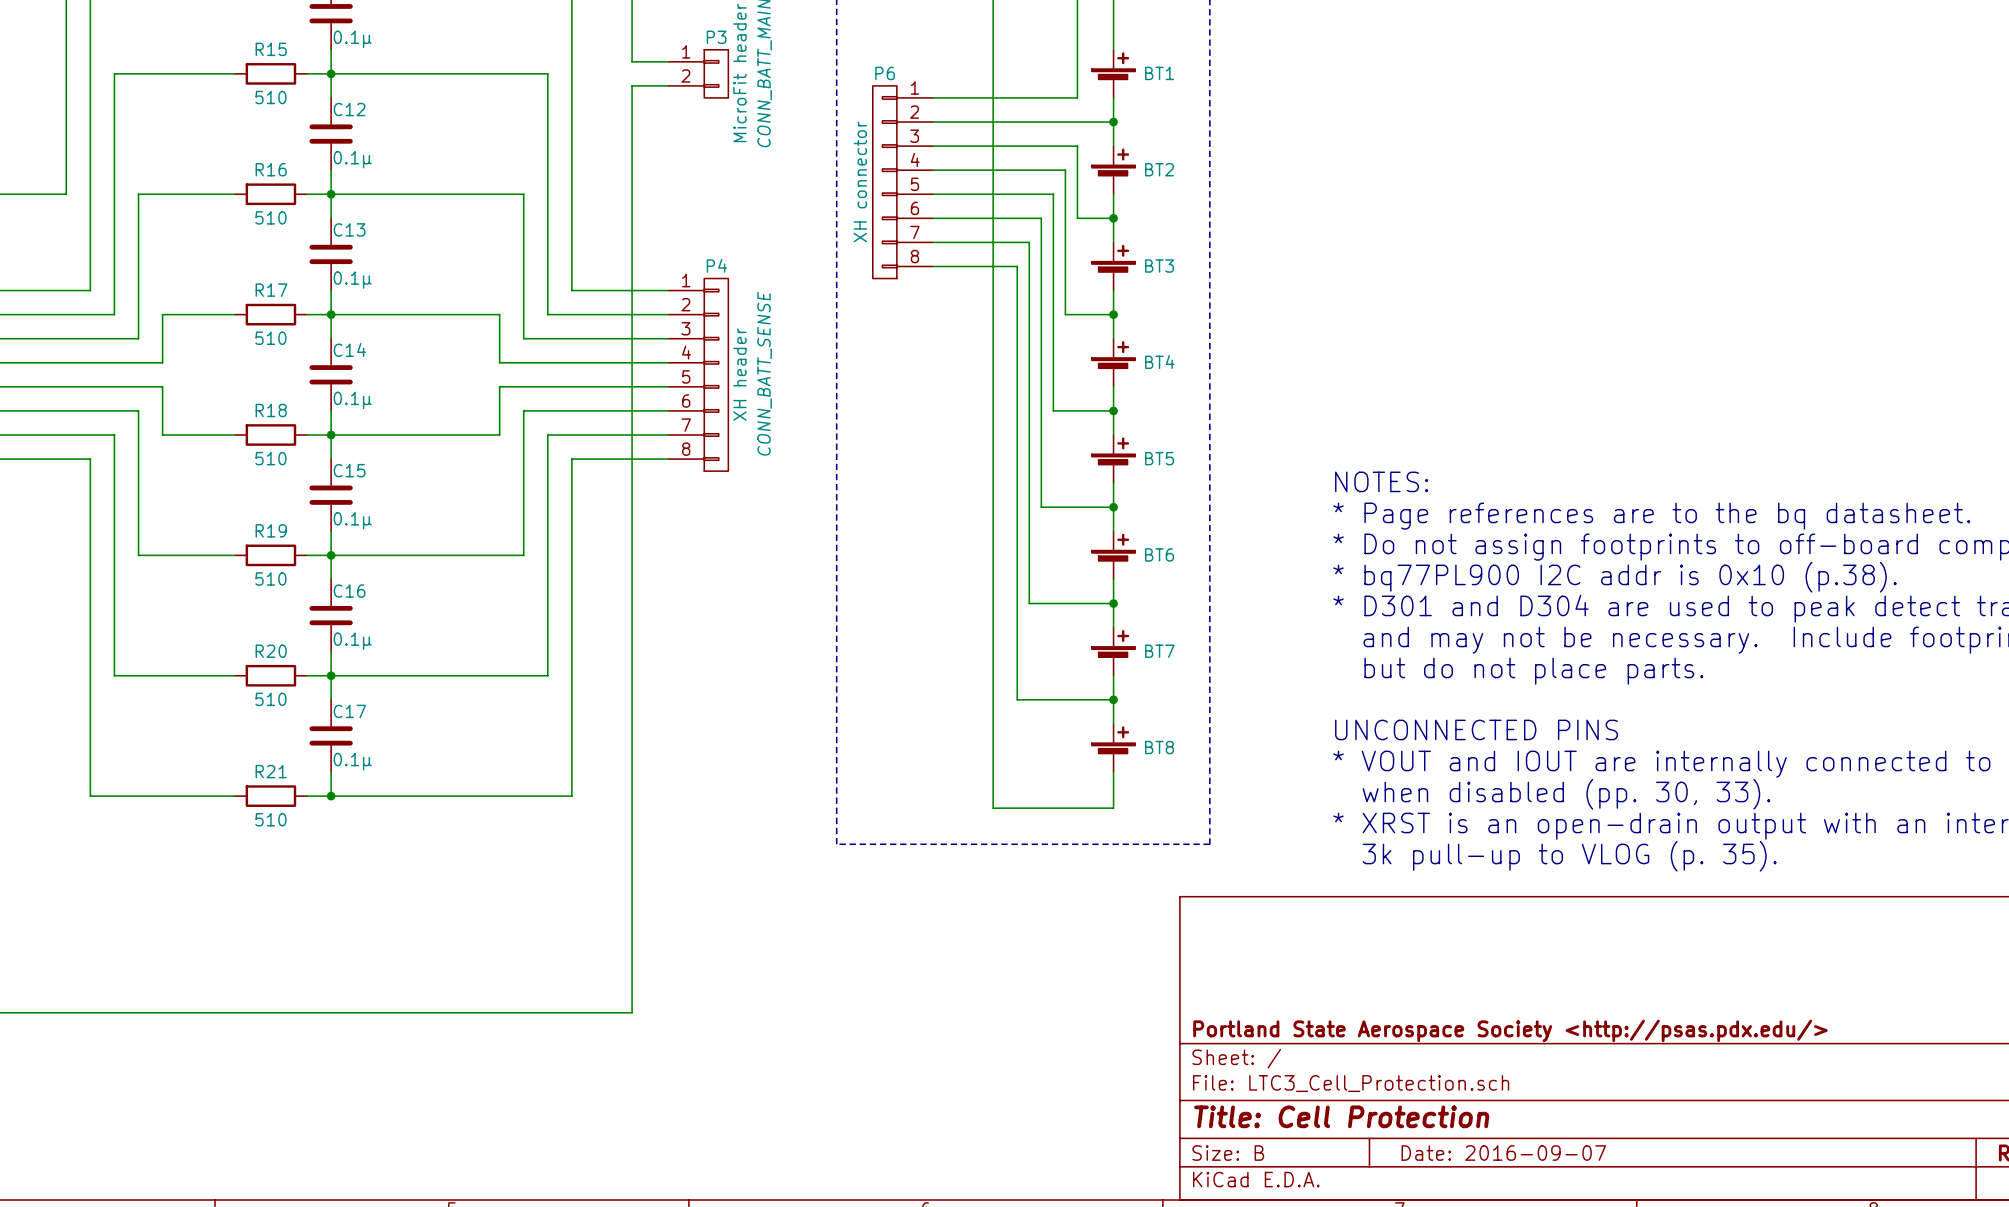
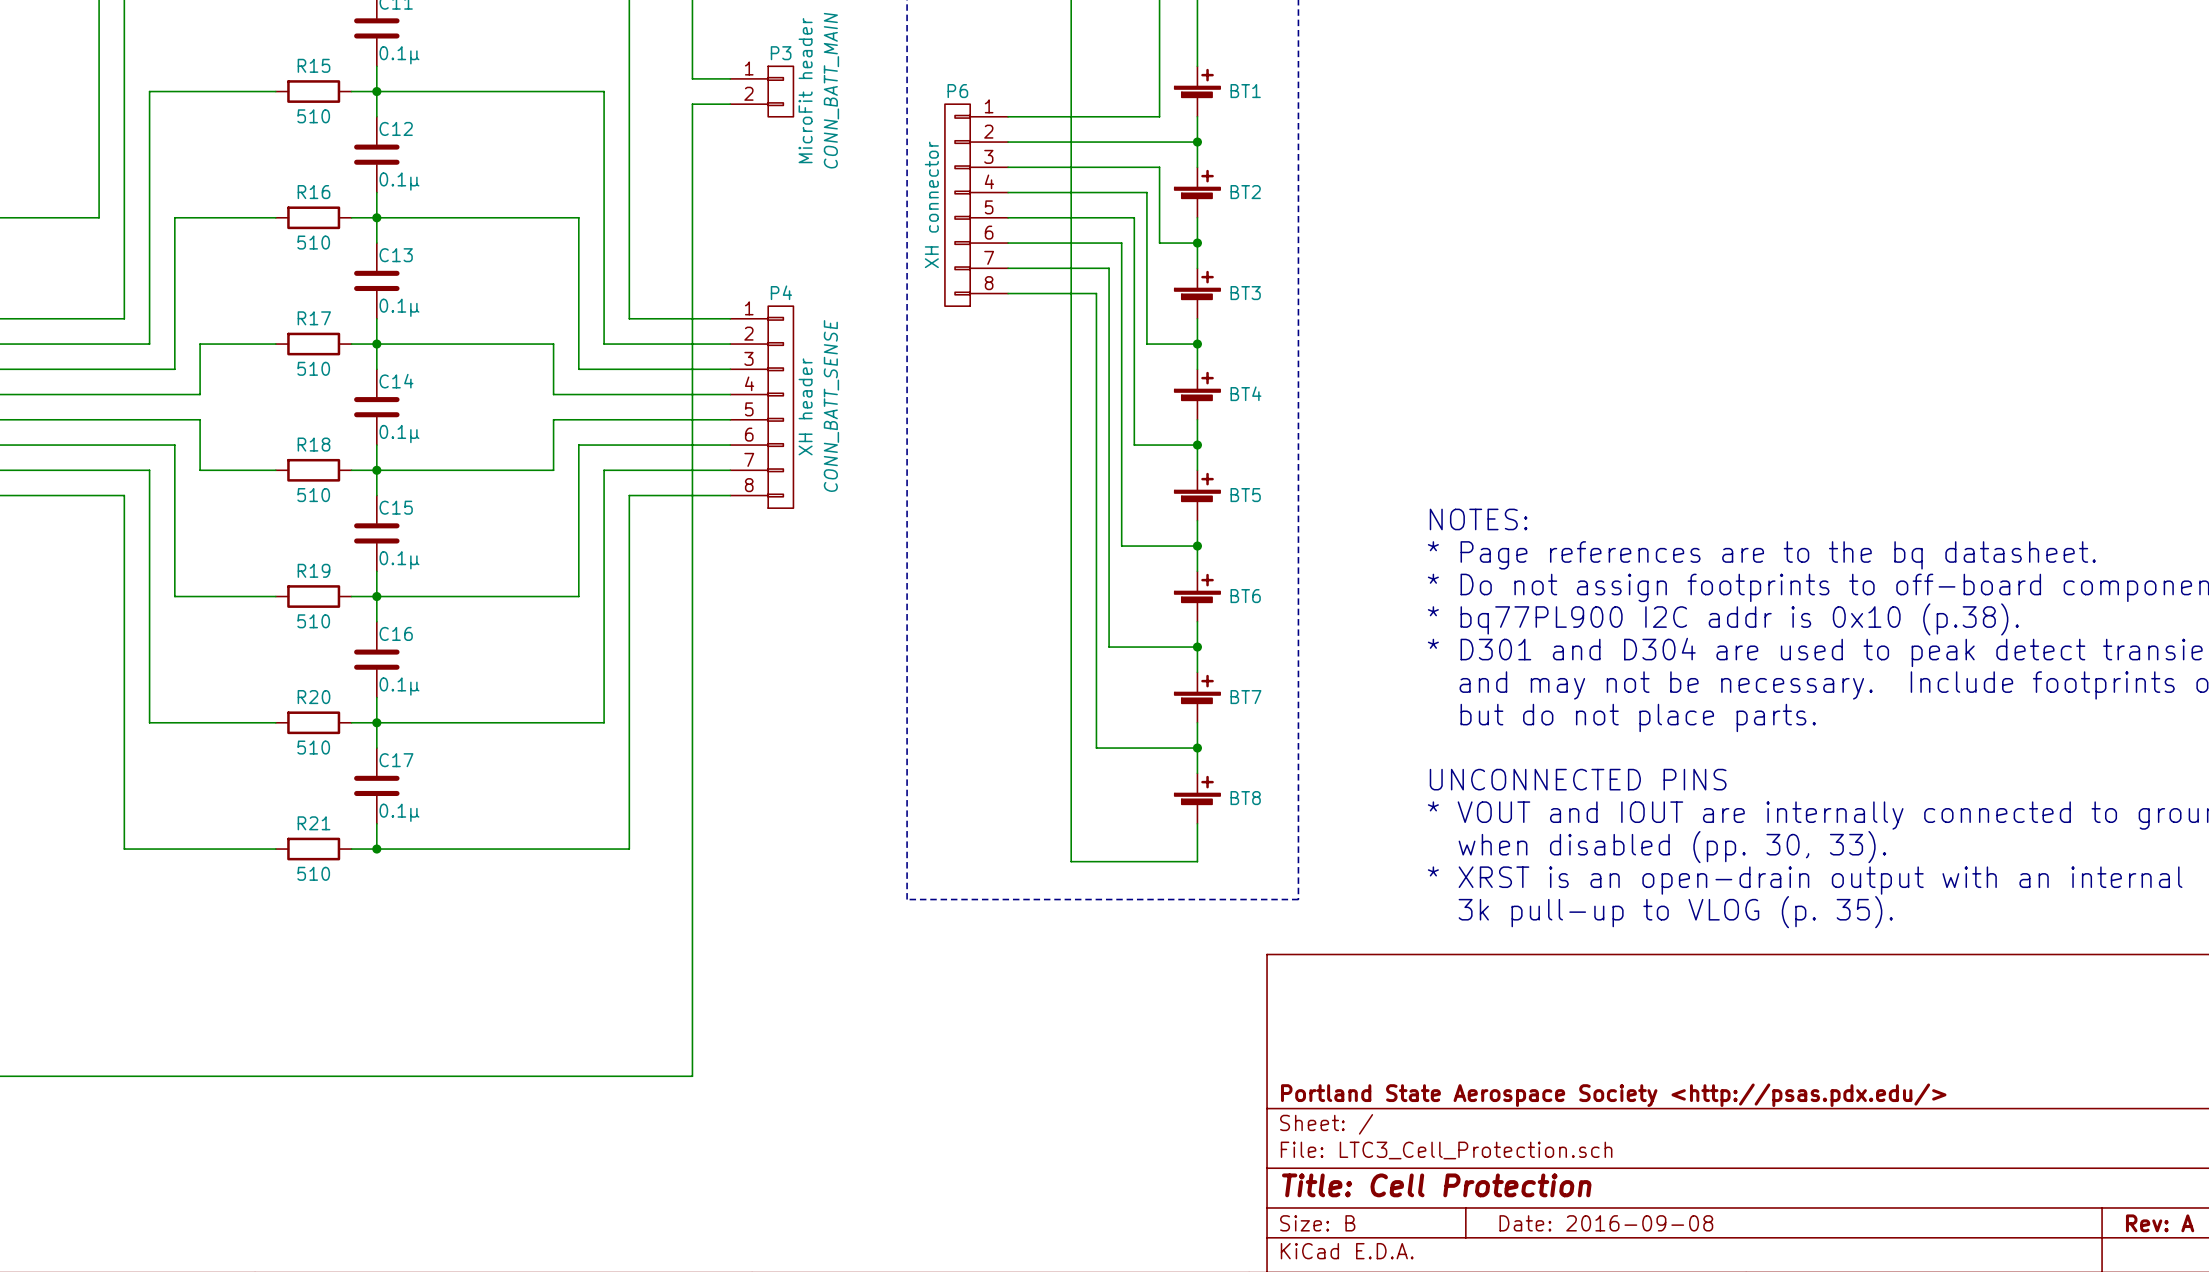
title block: Date: 2016-09-07 (1503, 1153) -> Date: 2016-09-08 (1606, 1223)

